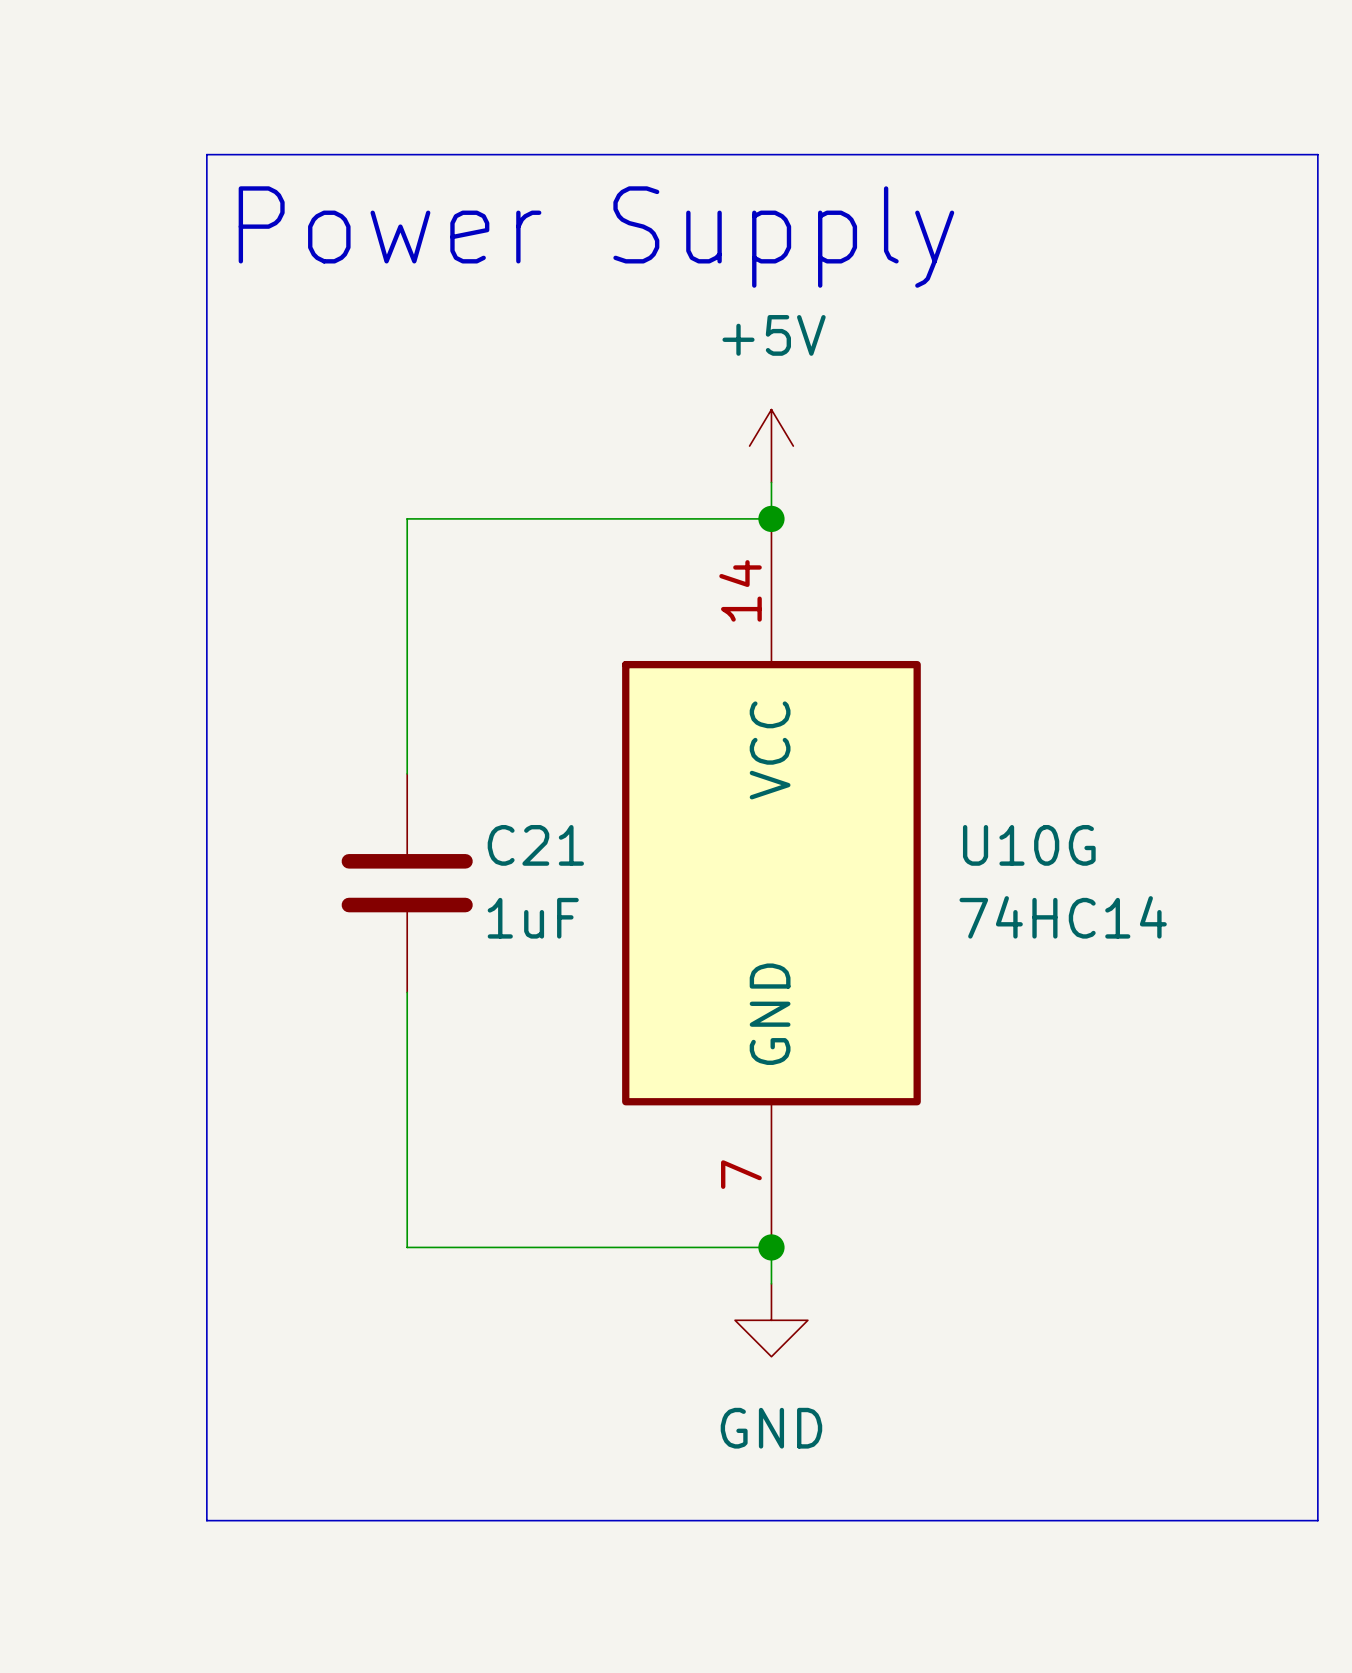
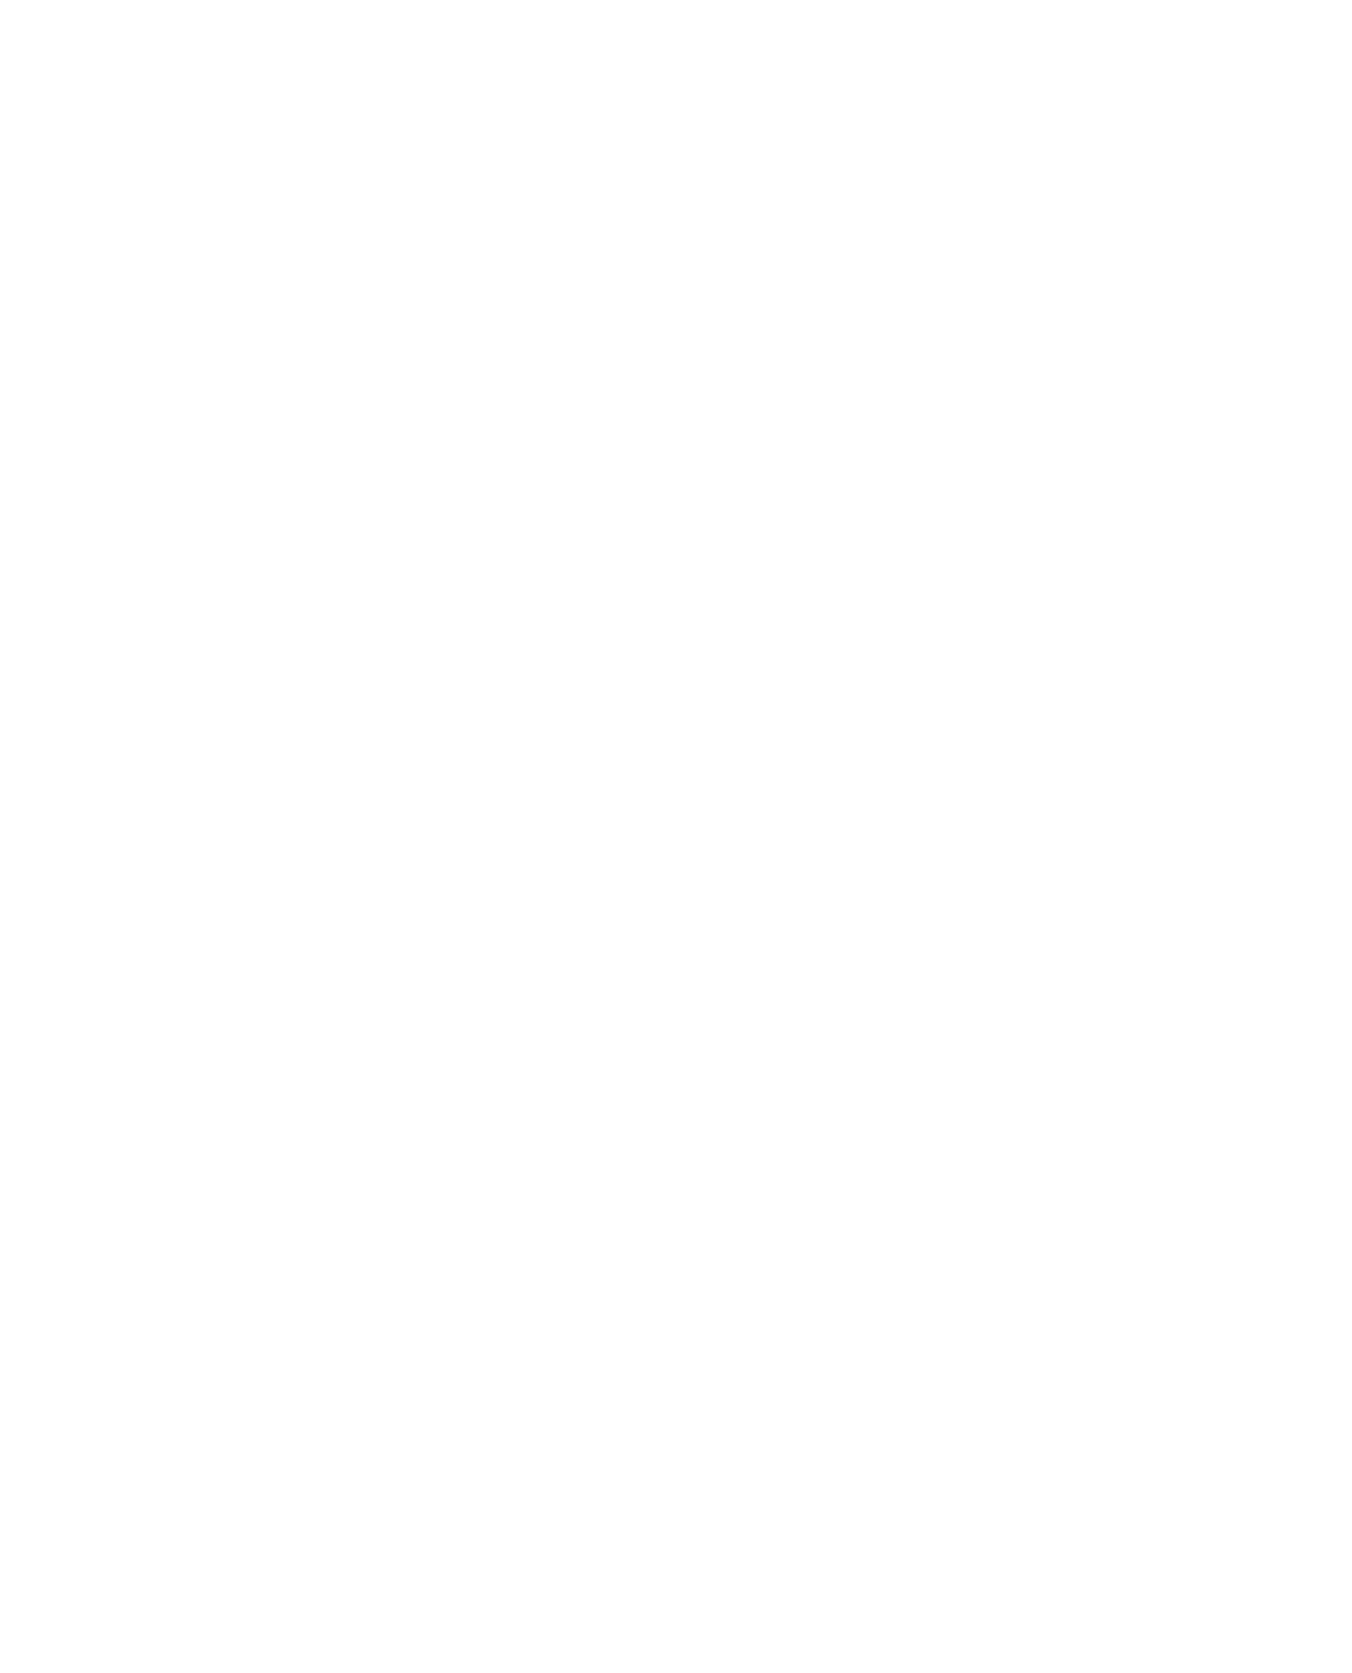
line: (206, 154) (1317, 154) (1317, 1520) (206, 1520) (206, 154) -> none
text: Power Supply (596, 237) -> none
power symbol: +5V (771, 446) -> none
wire: (771, 482) (771, 518) (407, 518) (407, 773) -> none
junction: (771, 518) -> none
C21: 1uF (407, 883) -> none
U10G: 74HC14 (771, 883) -> none
wire: (407, 992) (407, 1247) (771, 1247) (771, 1283) -> none
junction: (771, 1247) -> none
power symbol: GND (771, 1320) -> none

